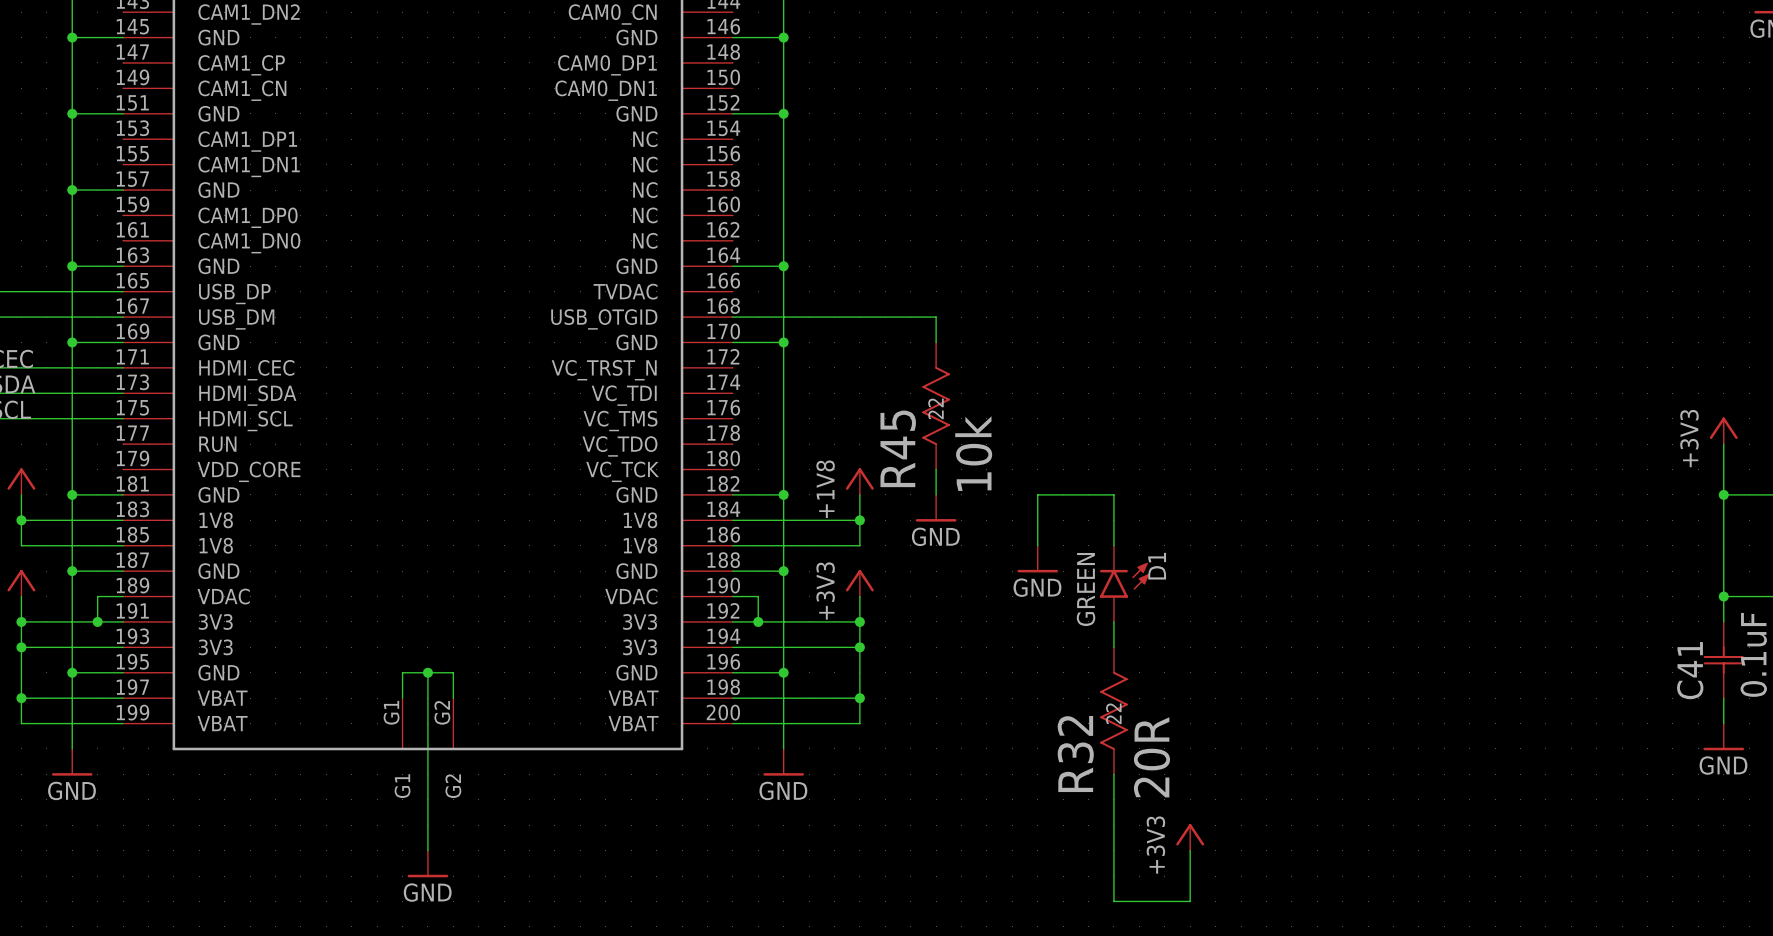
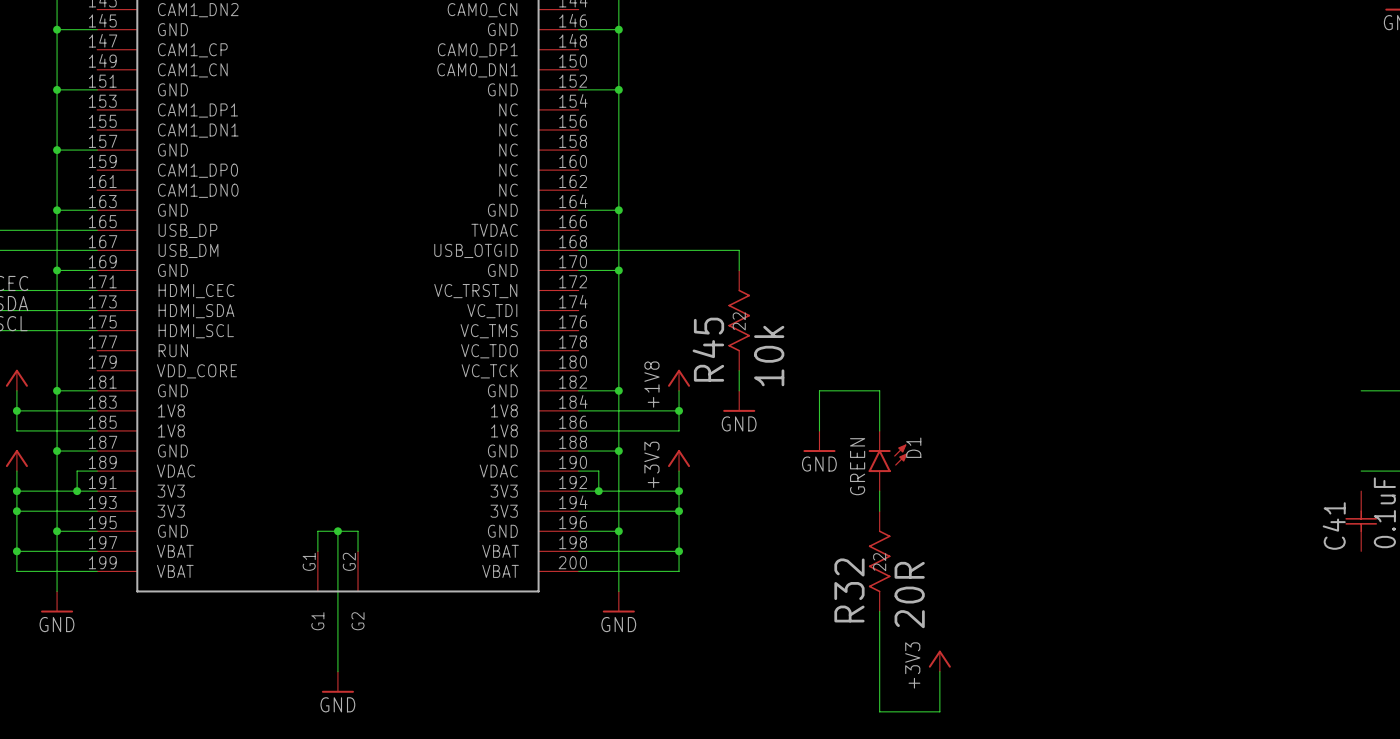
power symbol: +3V3 (1723, 430) -> none
wire: (1723, 444) (1723, 621) -> none
junction: (1723, 494) -> none
junction: (1723, 596) -> none
wire: (1723, 698) (1723, 723) -> none
power symbol: GND (1723, 736) -> none

